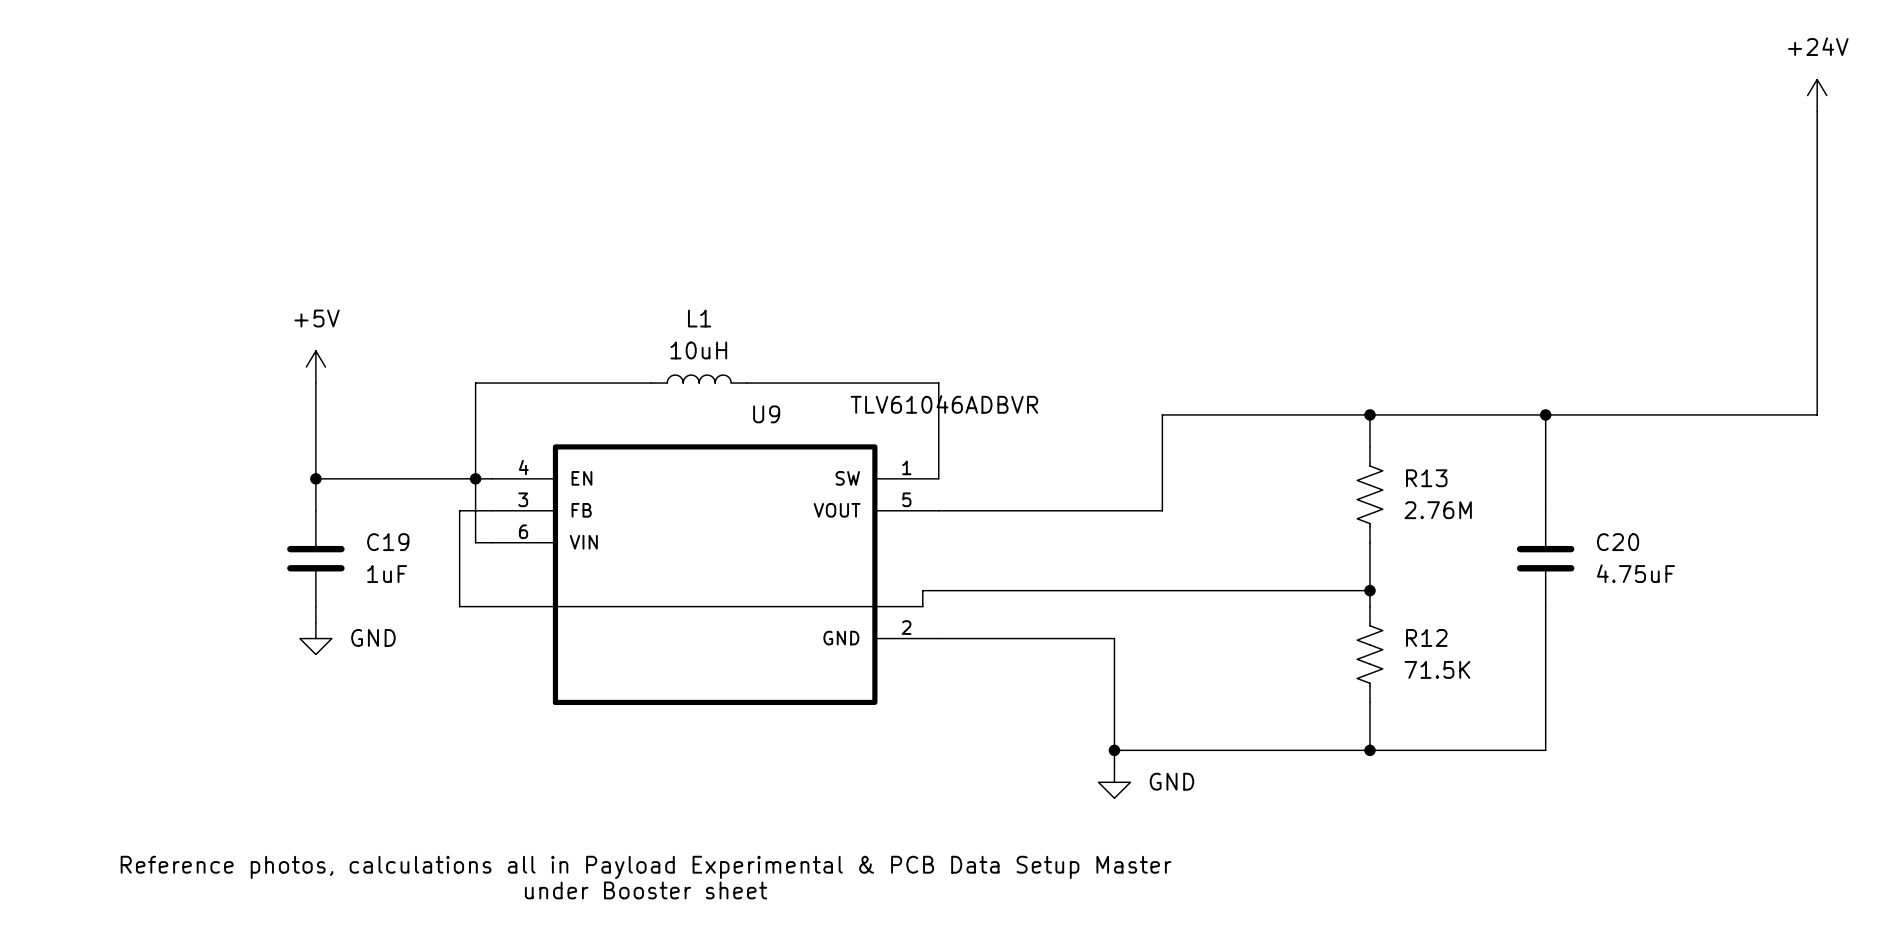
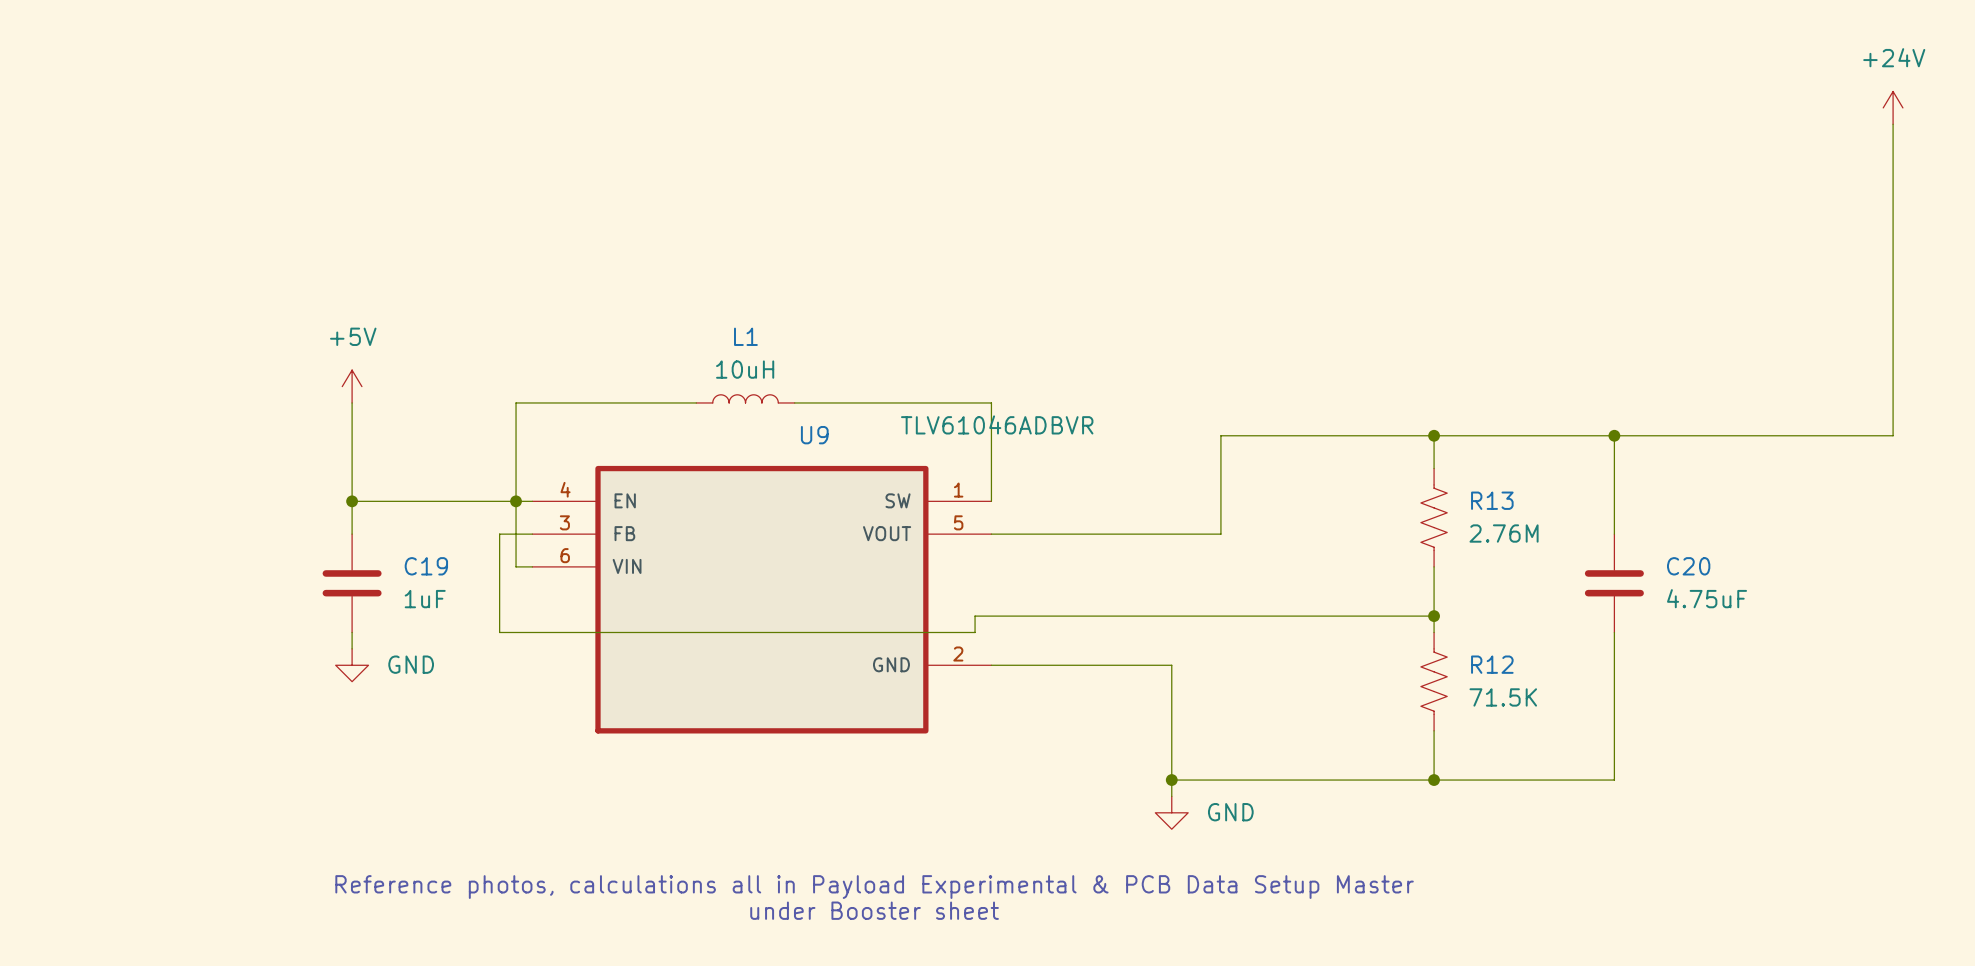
text position: Reference photos, calculations all in Payload Experimental & PCB Data Setup Master (646, 867) -> Reference photos, calculations all in Payload Experimental & PCB Data Setup Master (874, 887)
text position: under Booster sheet (646, 890) -> under Booster sheet (874, 910)

